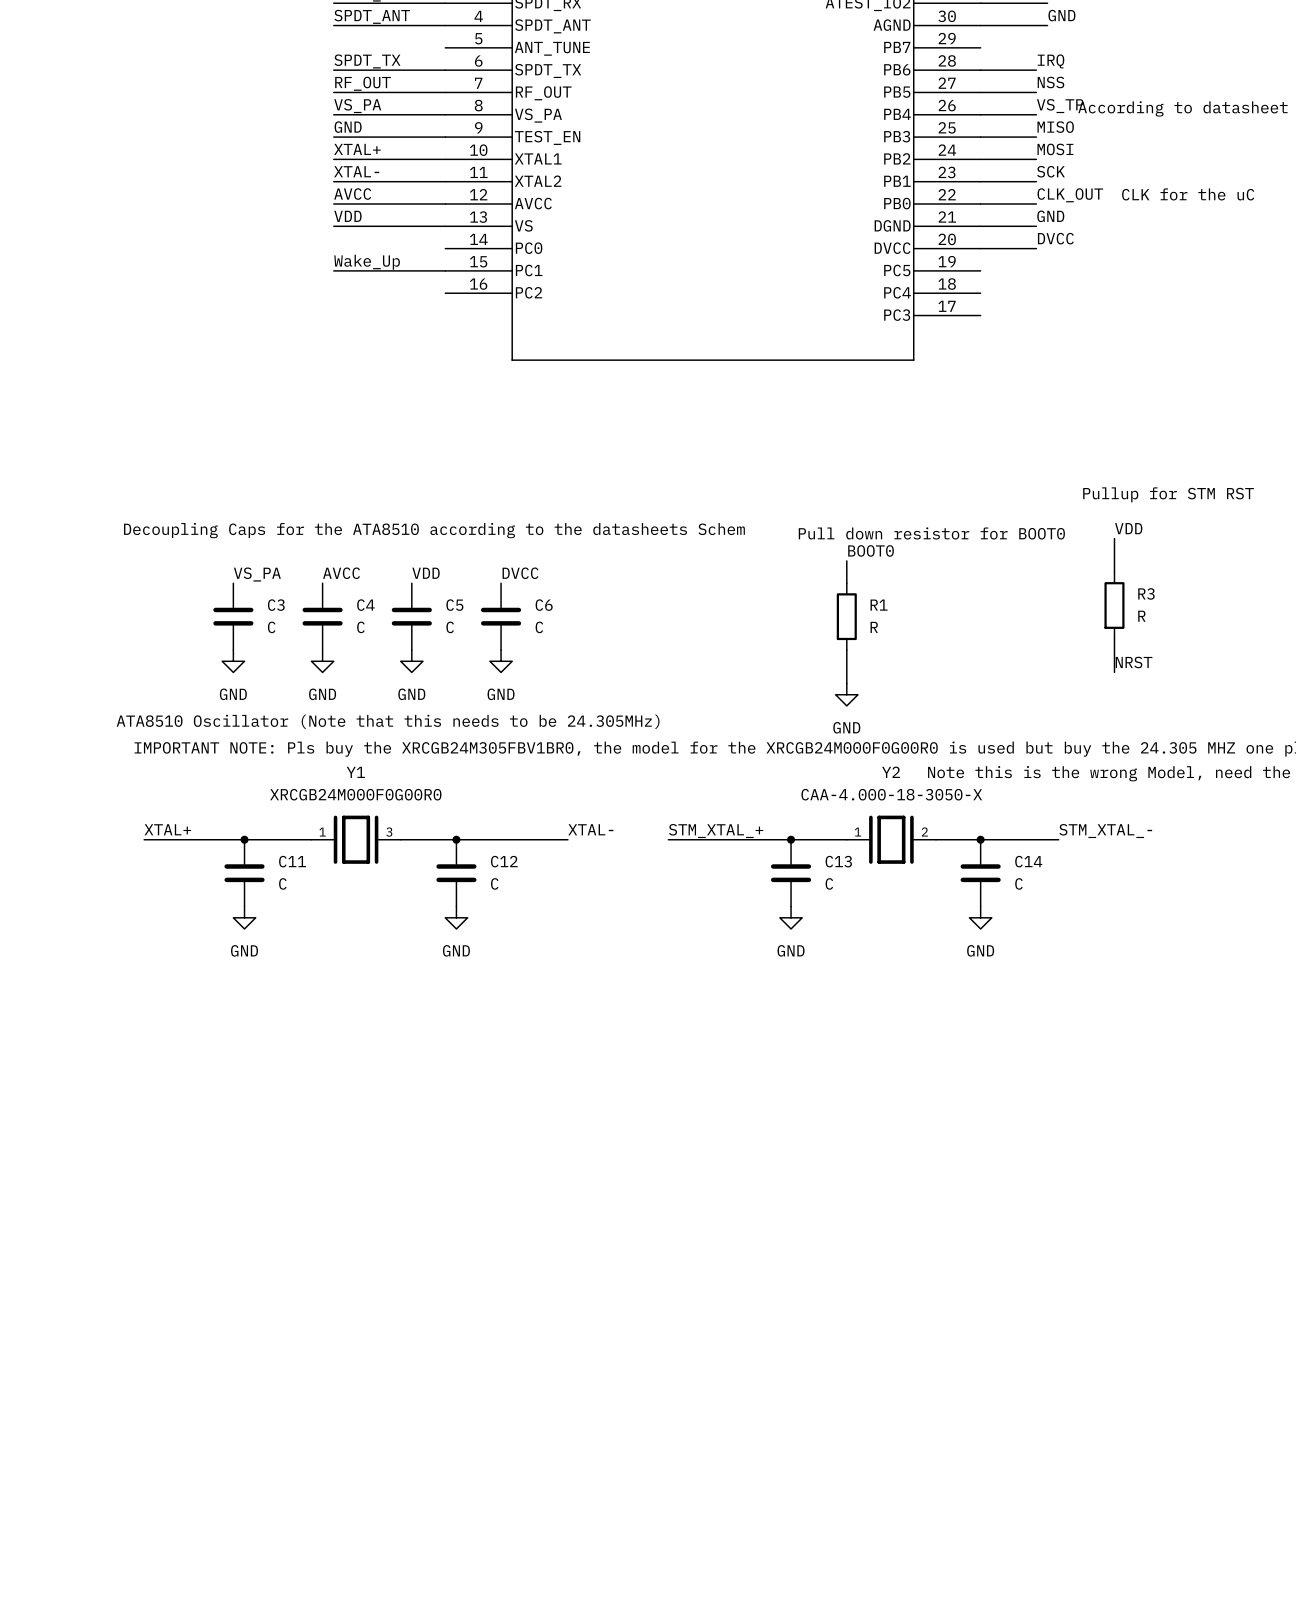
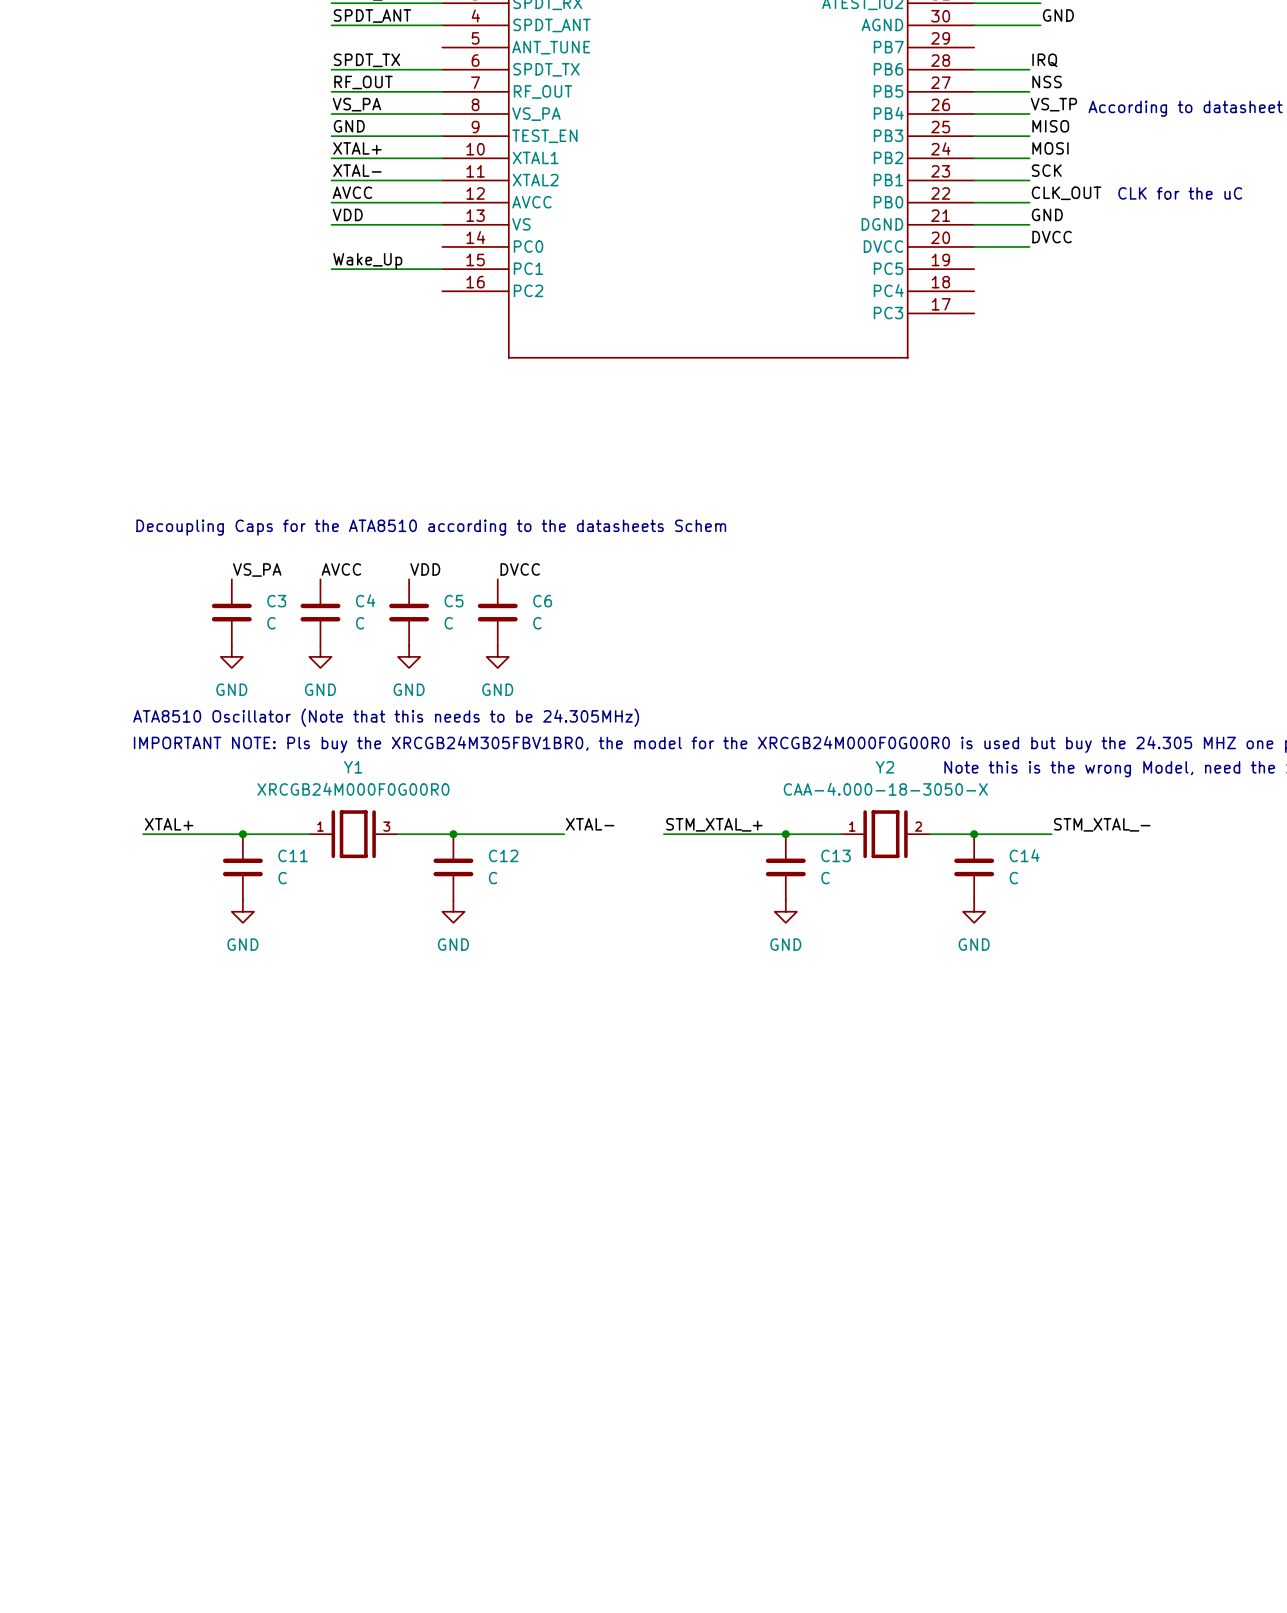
text: Pullup for STM RST (1168, 494) -> none
label: VDD (1128, 528) -> none
text: Pull down resistor for BOOT0 (931, 533) -> none
wire: (1114, 538) (1114, 572) -> none
label: BOOT0 (871, 550) -> none
wire: (846, 560) (846, 583) -> none
R3: R (1114, 605) -> none
R1: R (846, 616) -> none
wire: (1114, 638) (1114, 672) -> none
wire: (846, 650) (846, 683) -> none
label: NRST (1134, 662) -> none
power symbol: GND (846, 694) -> none

